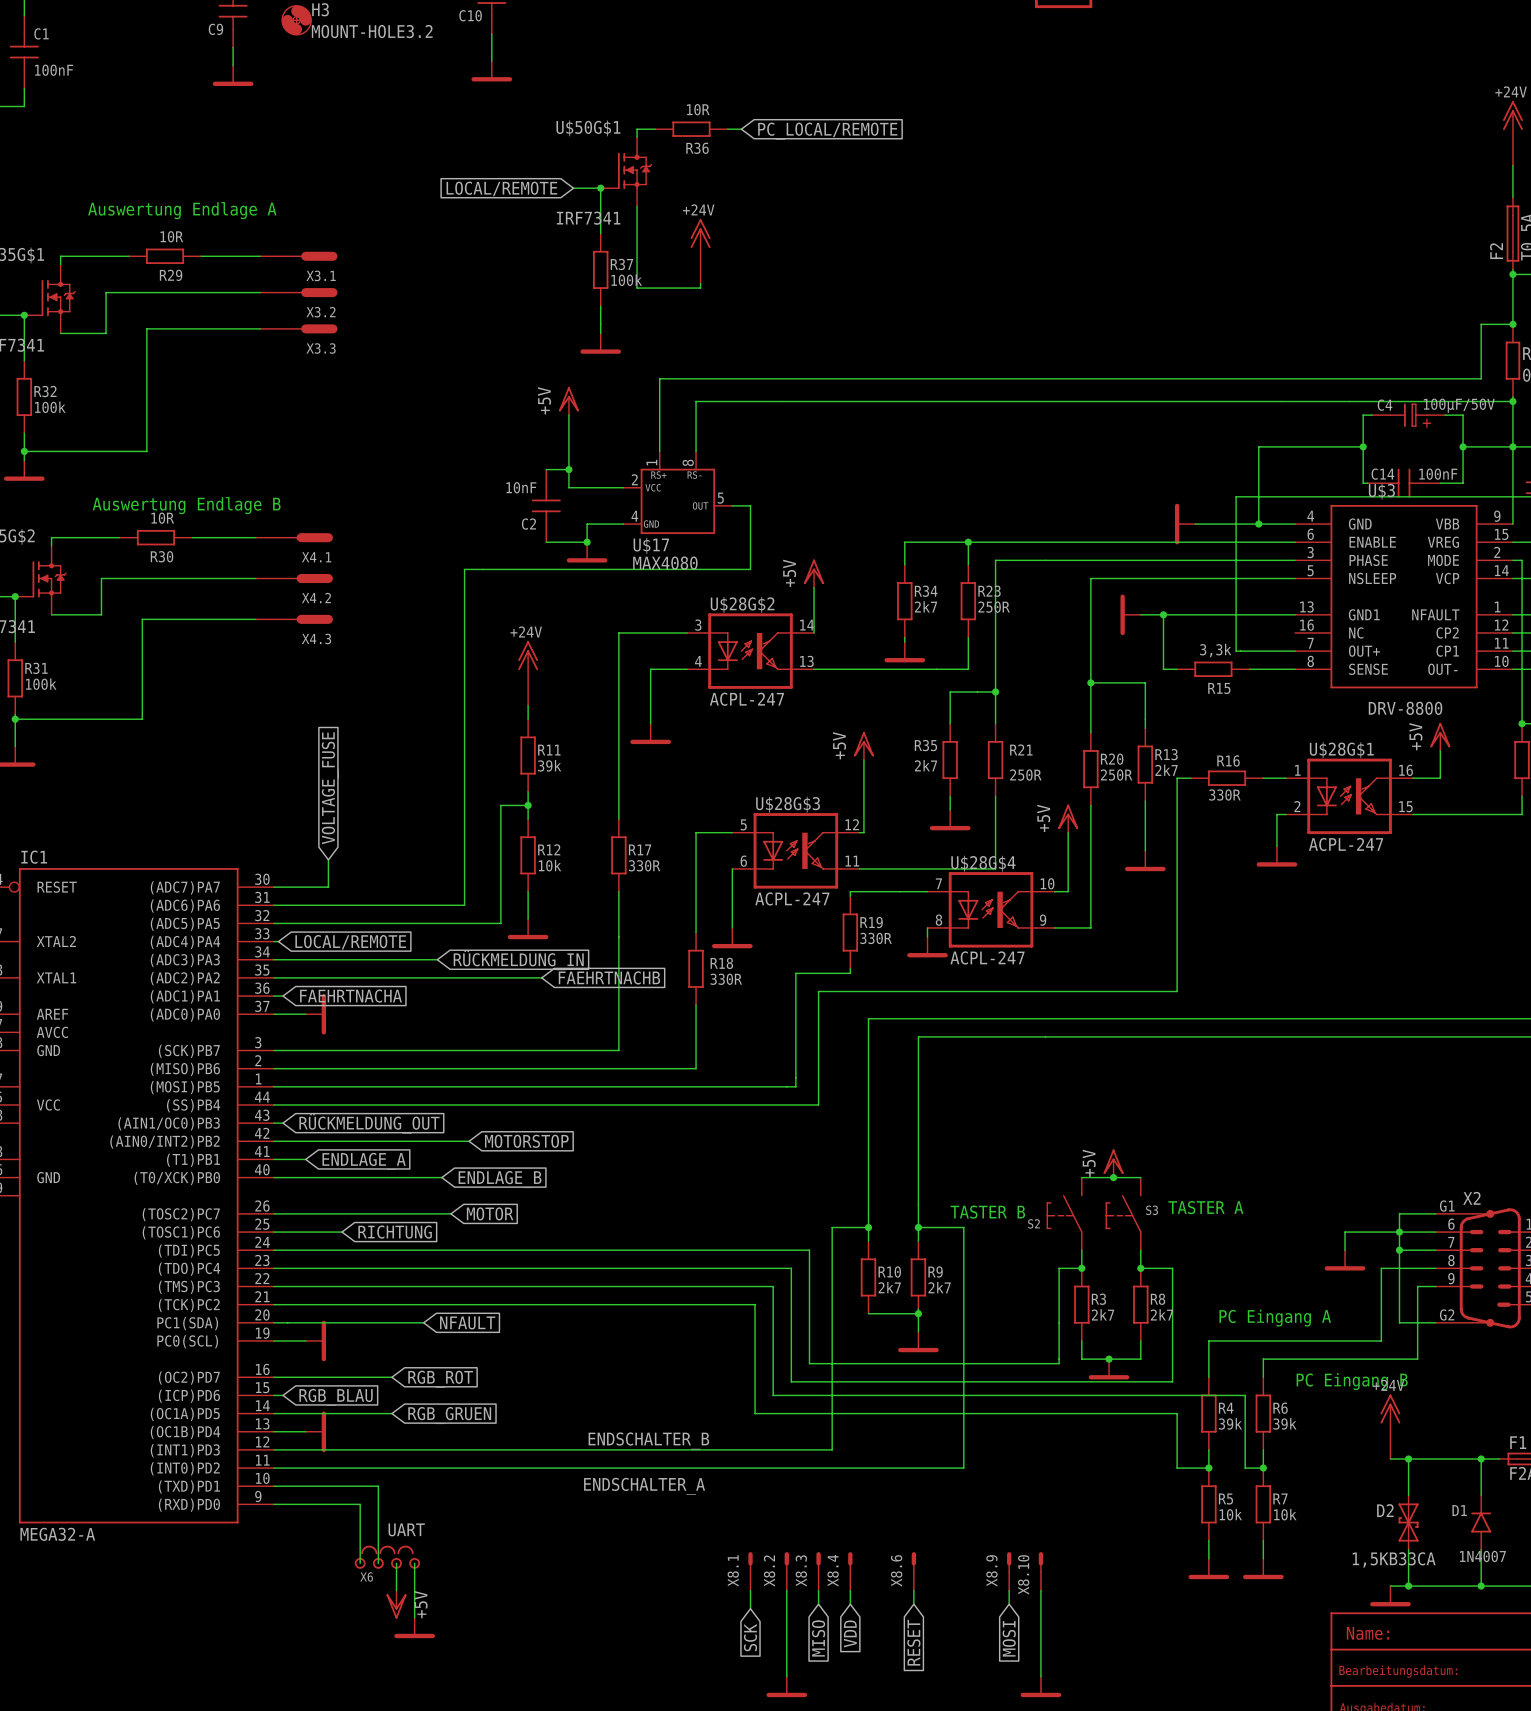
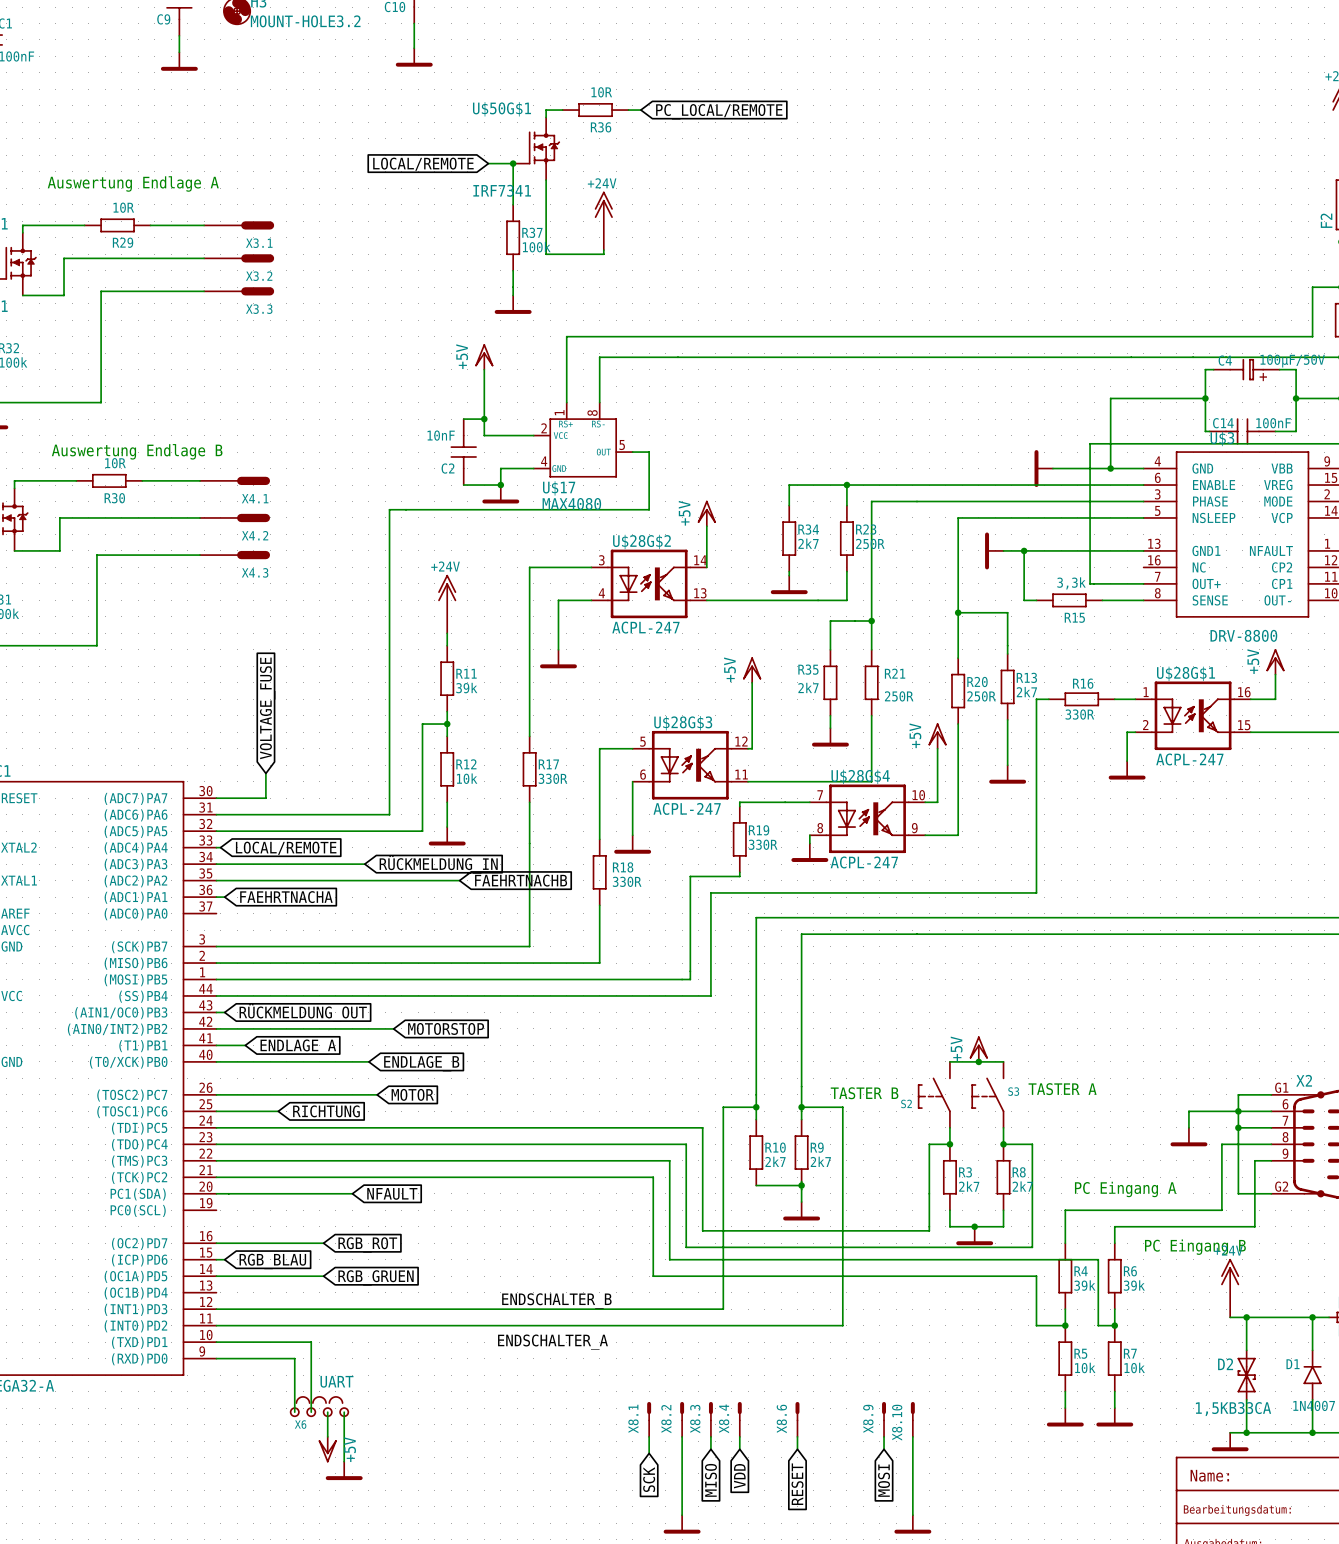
wire: (273, 1014) (305, 1014) -> none
power symbol: (315, 1014) -> none
wire: (273, 1340) (305, 1340) -> none
power symbol: (315, 1340) -> none
wire: (273, 1431) (305, 1431) -> none
power symbol: (315, 1431) -> none

